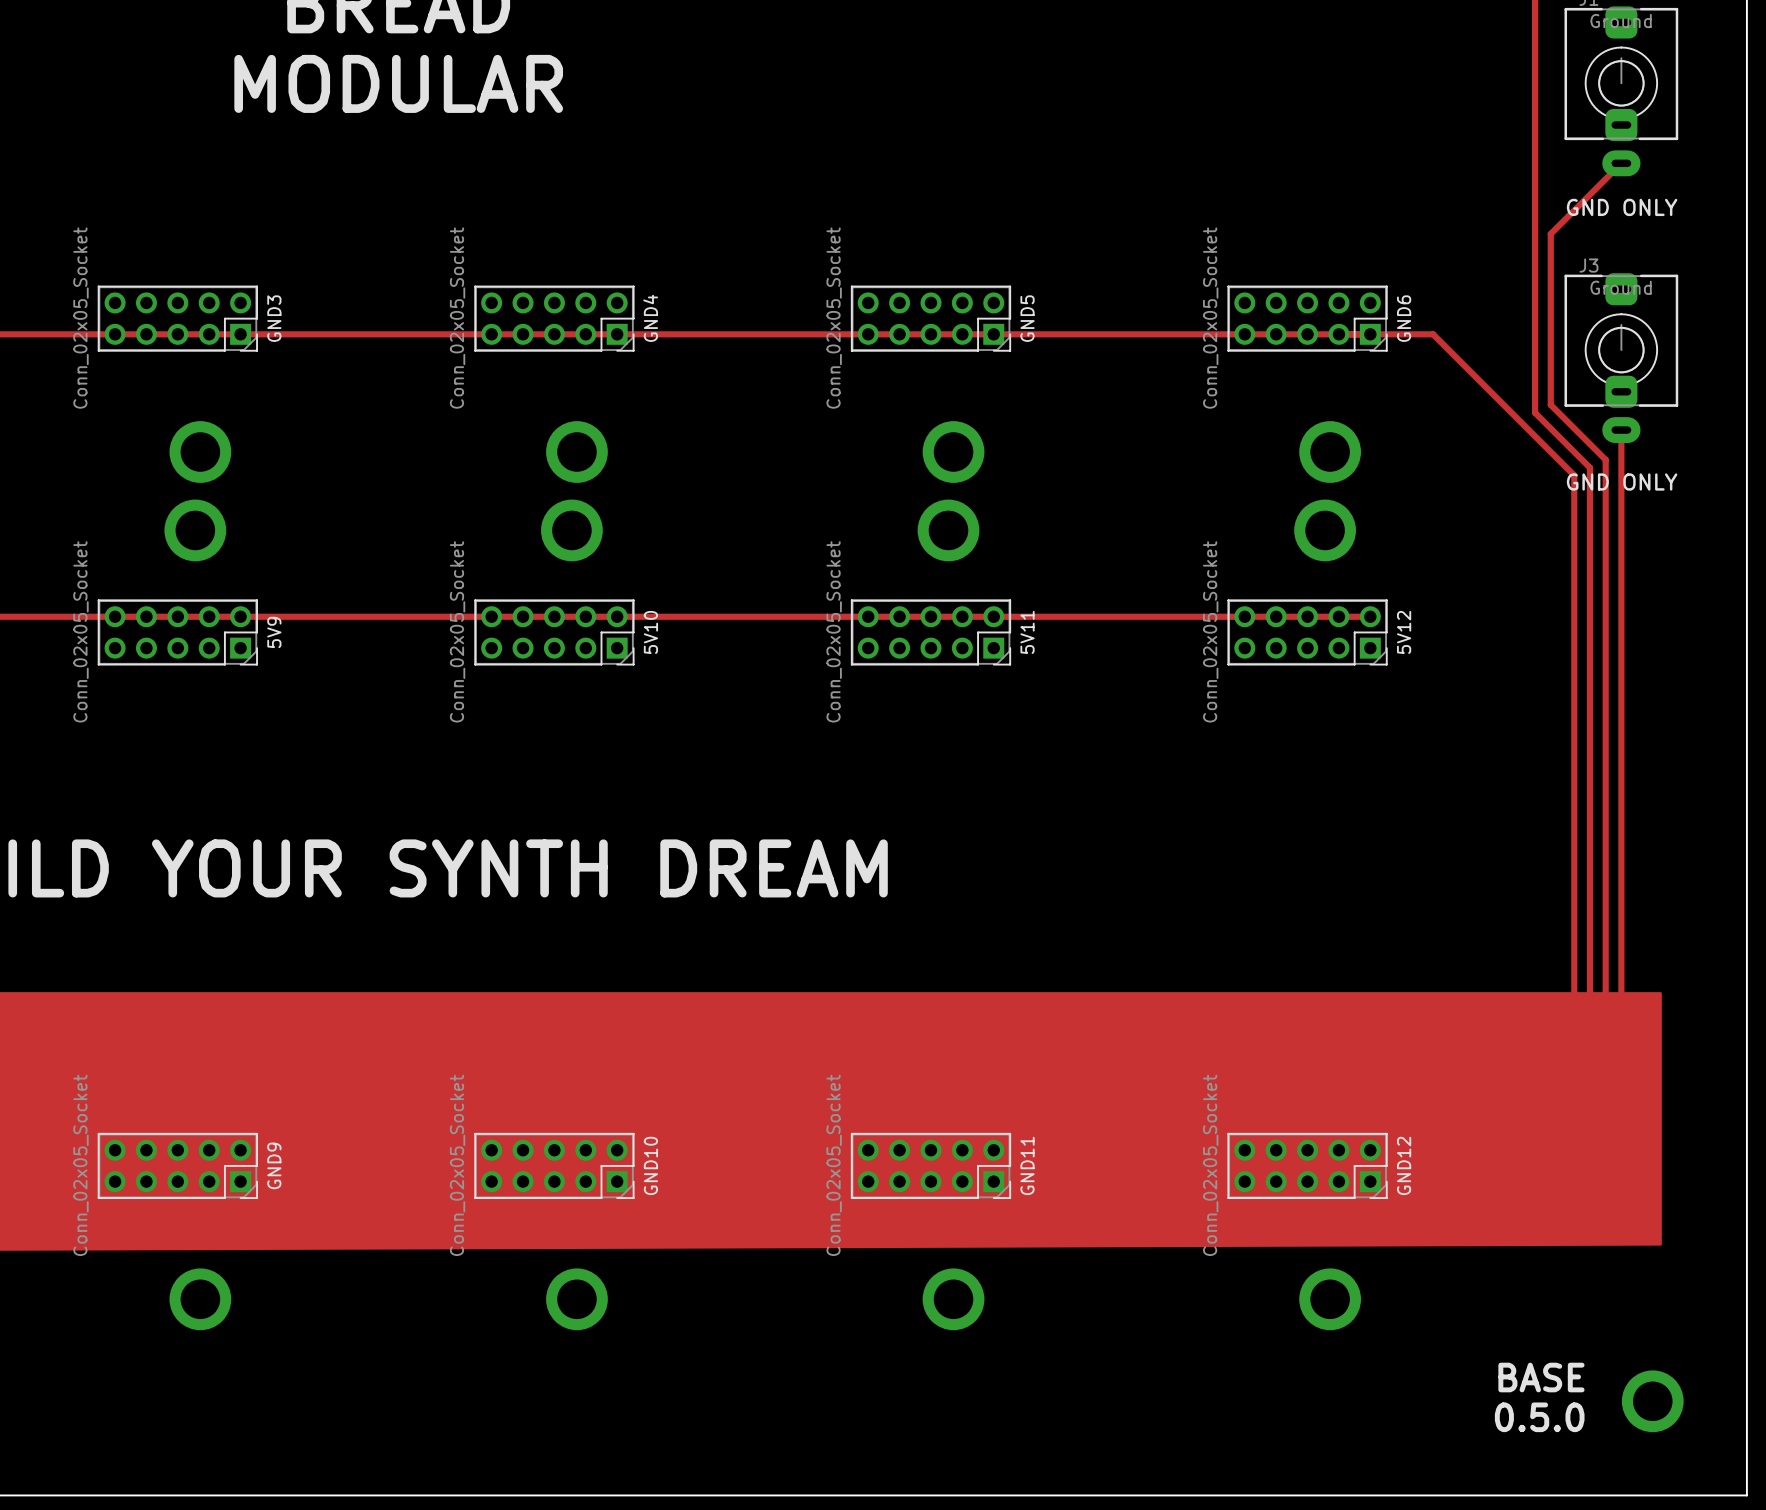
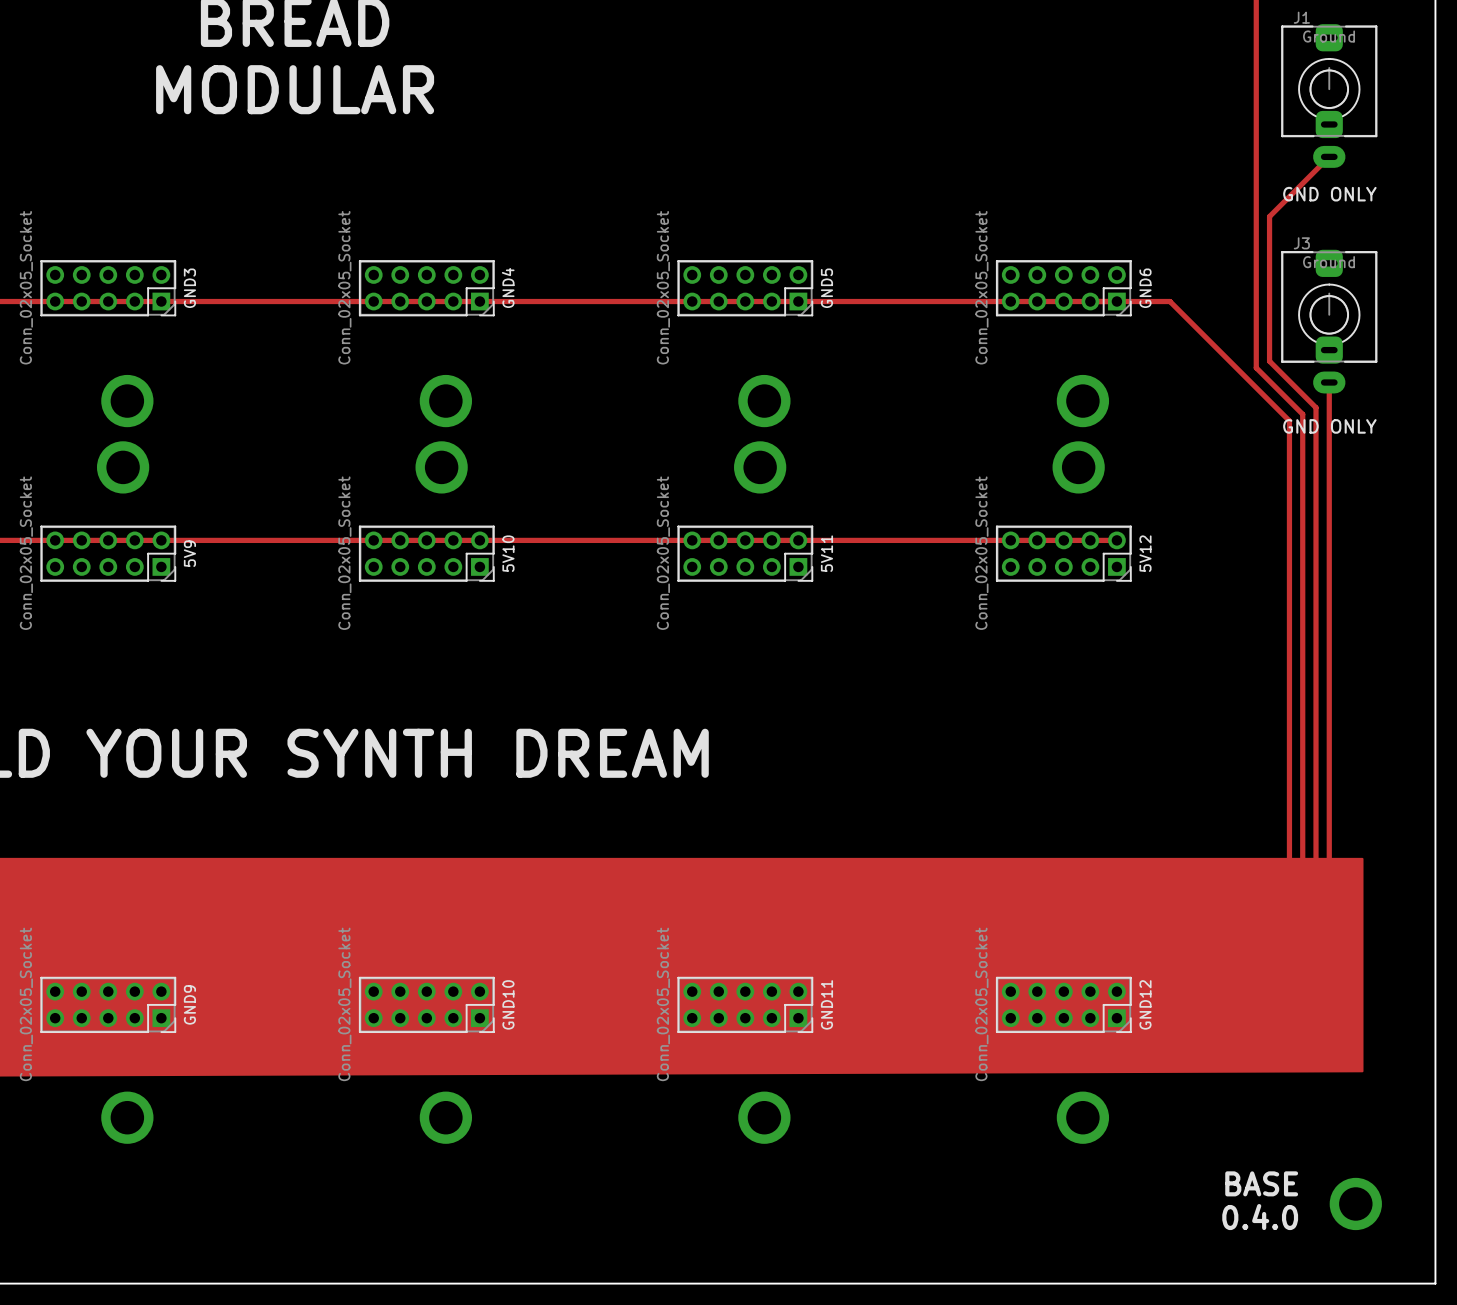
text: 0.5.0 (1539, 1417) -> 0.4.0 (1260, 1217)

